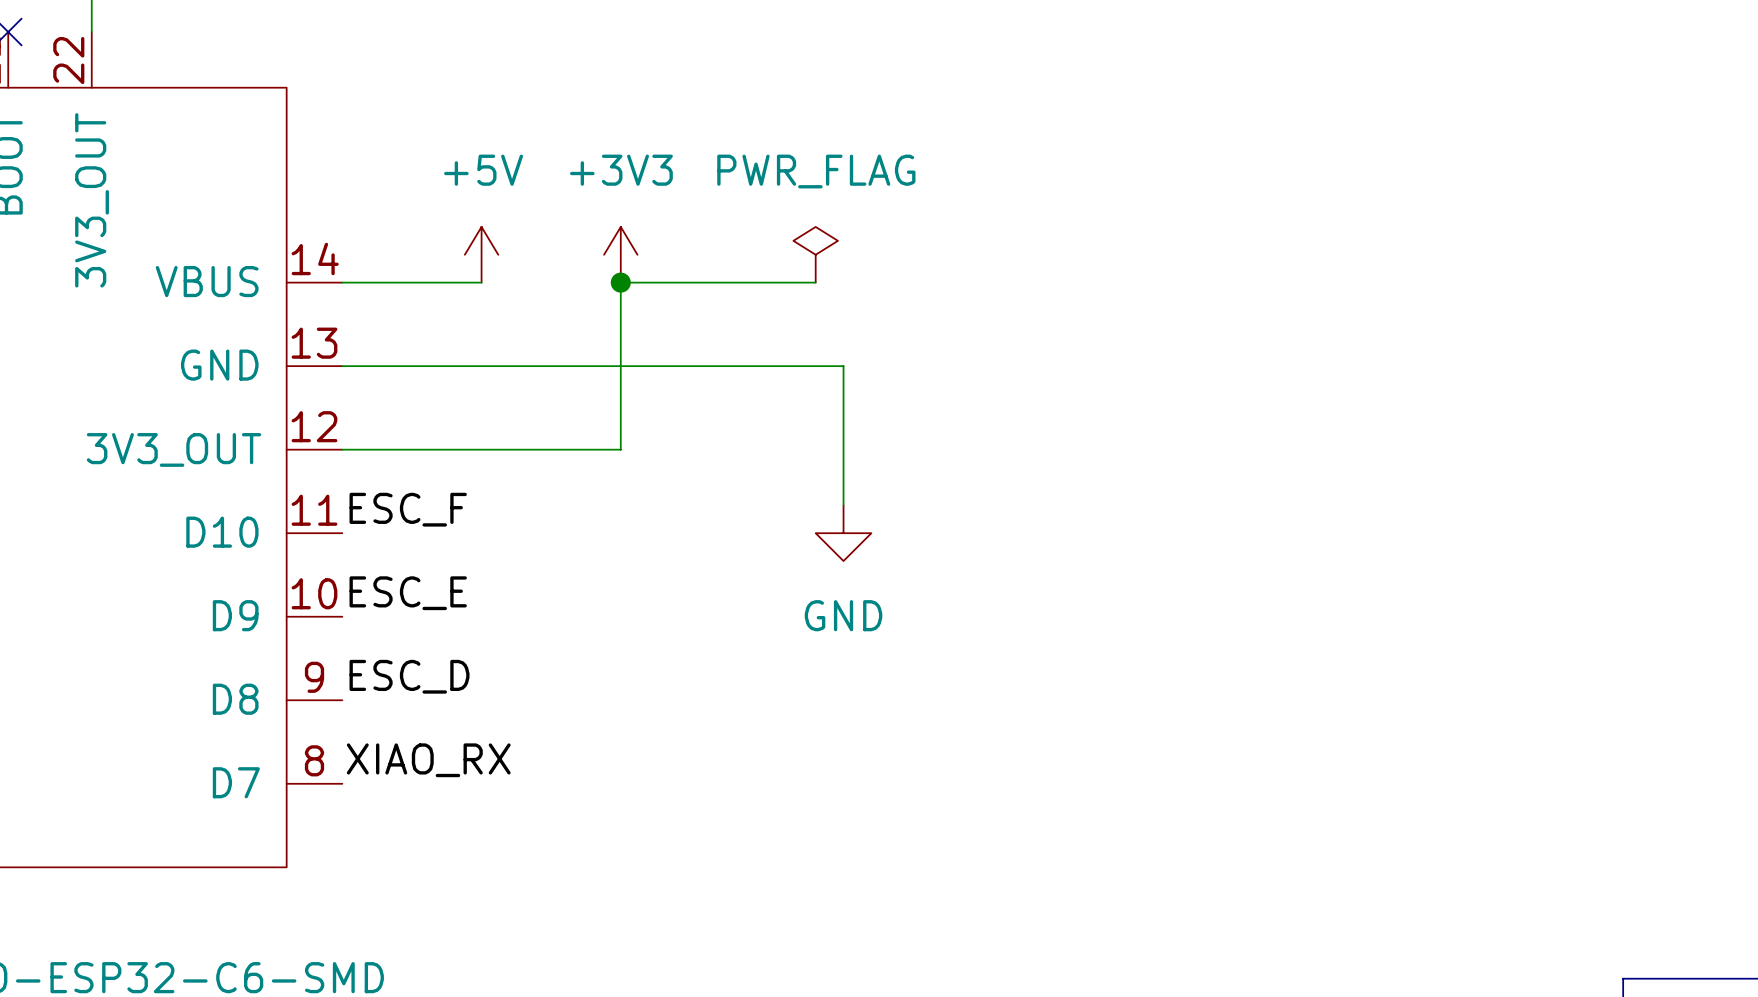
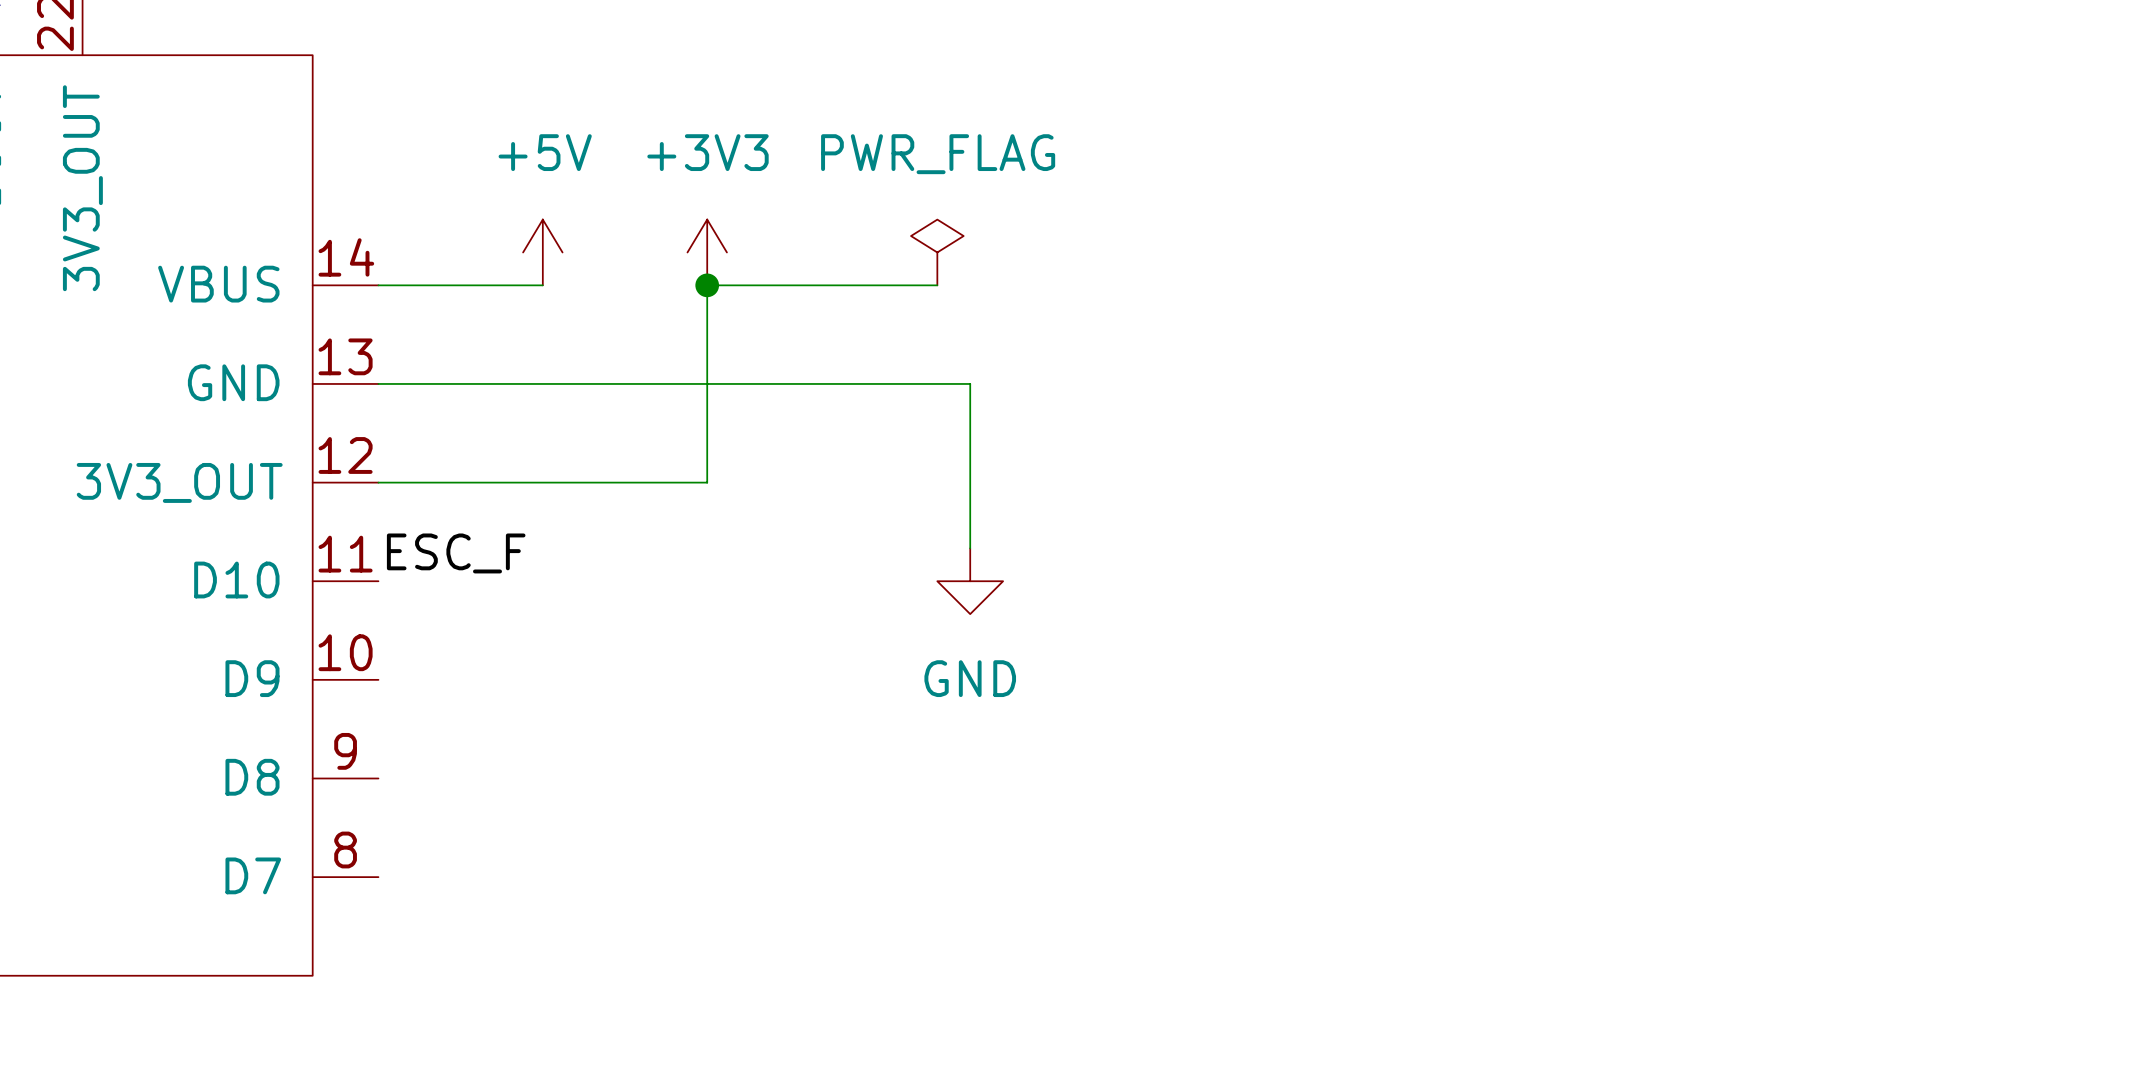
label: ESC_E (408, 593) -> none
label: ESC_D (409, 676) -> none
label: XIAO_RX (428, 760) -> none

